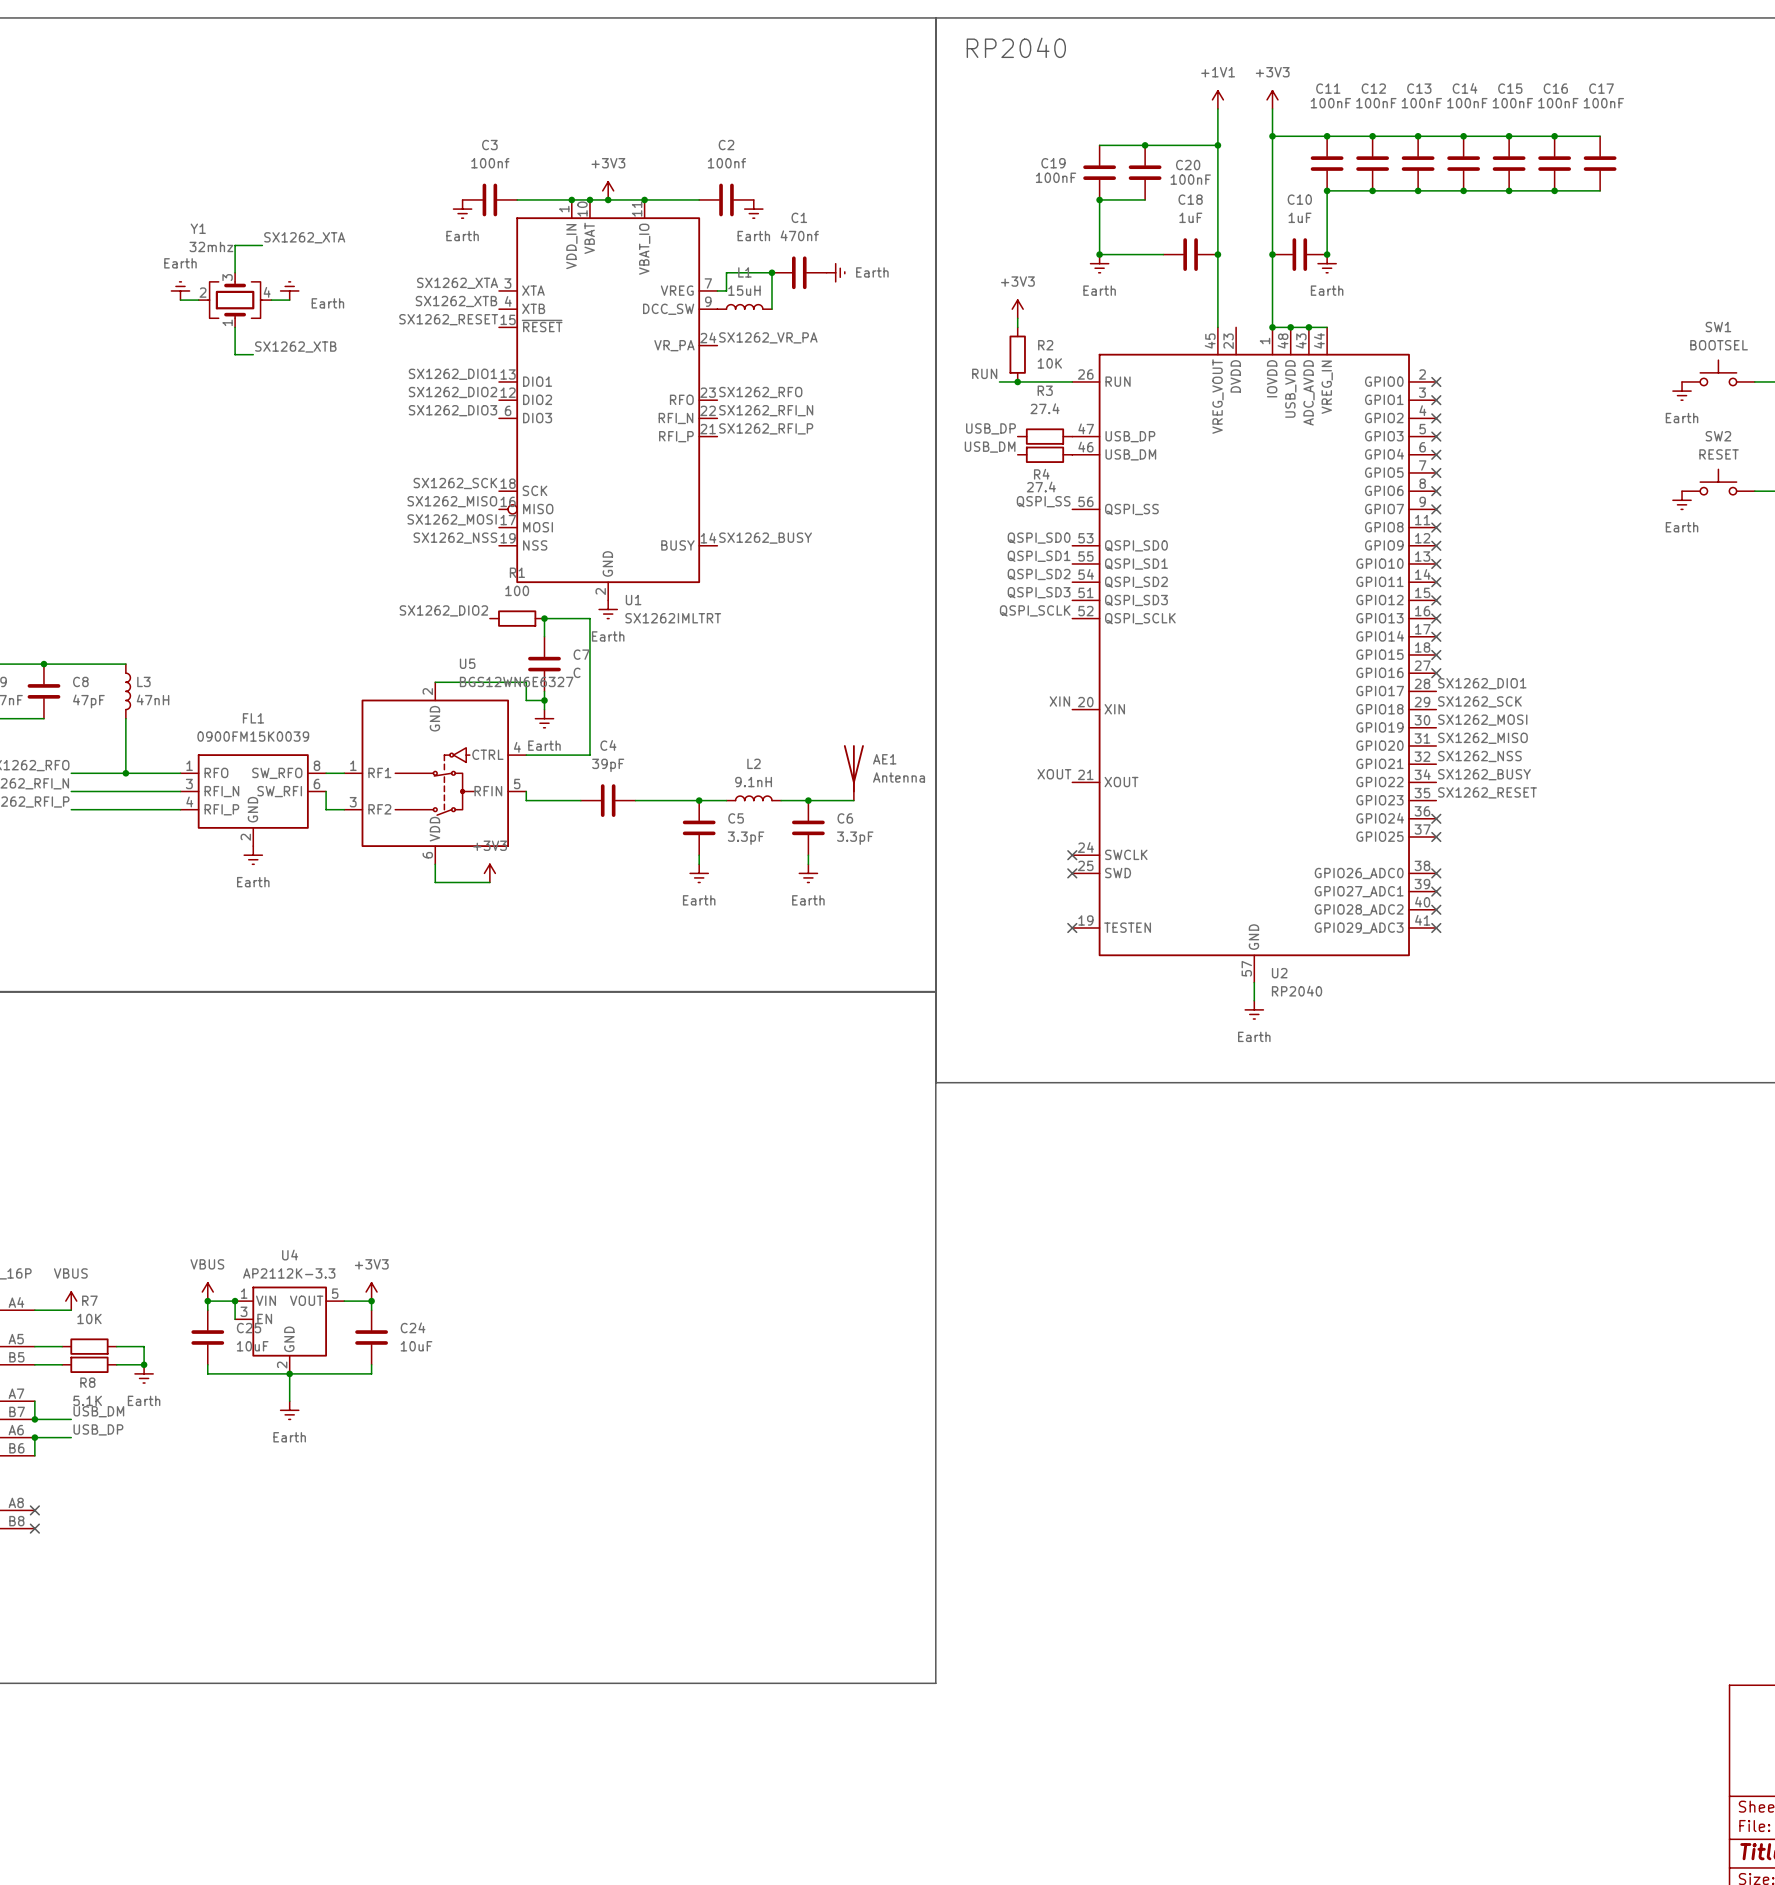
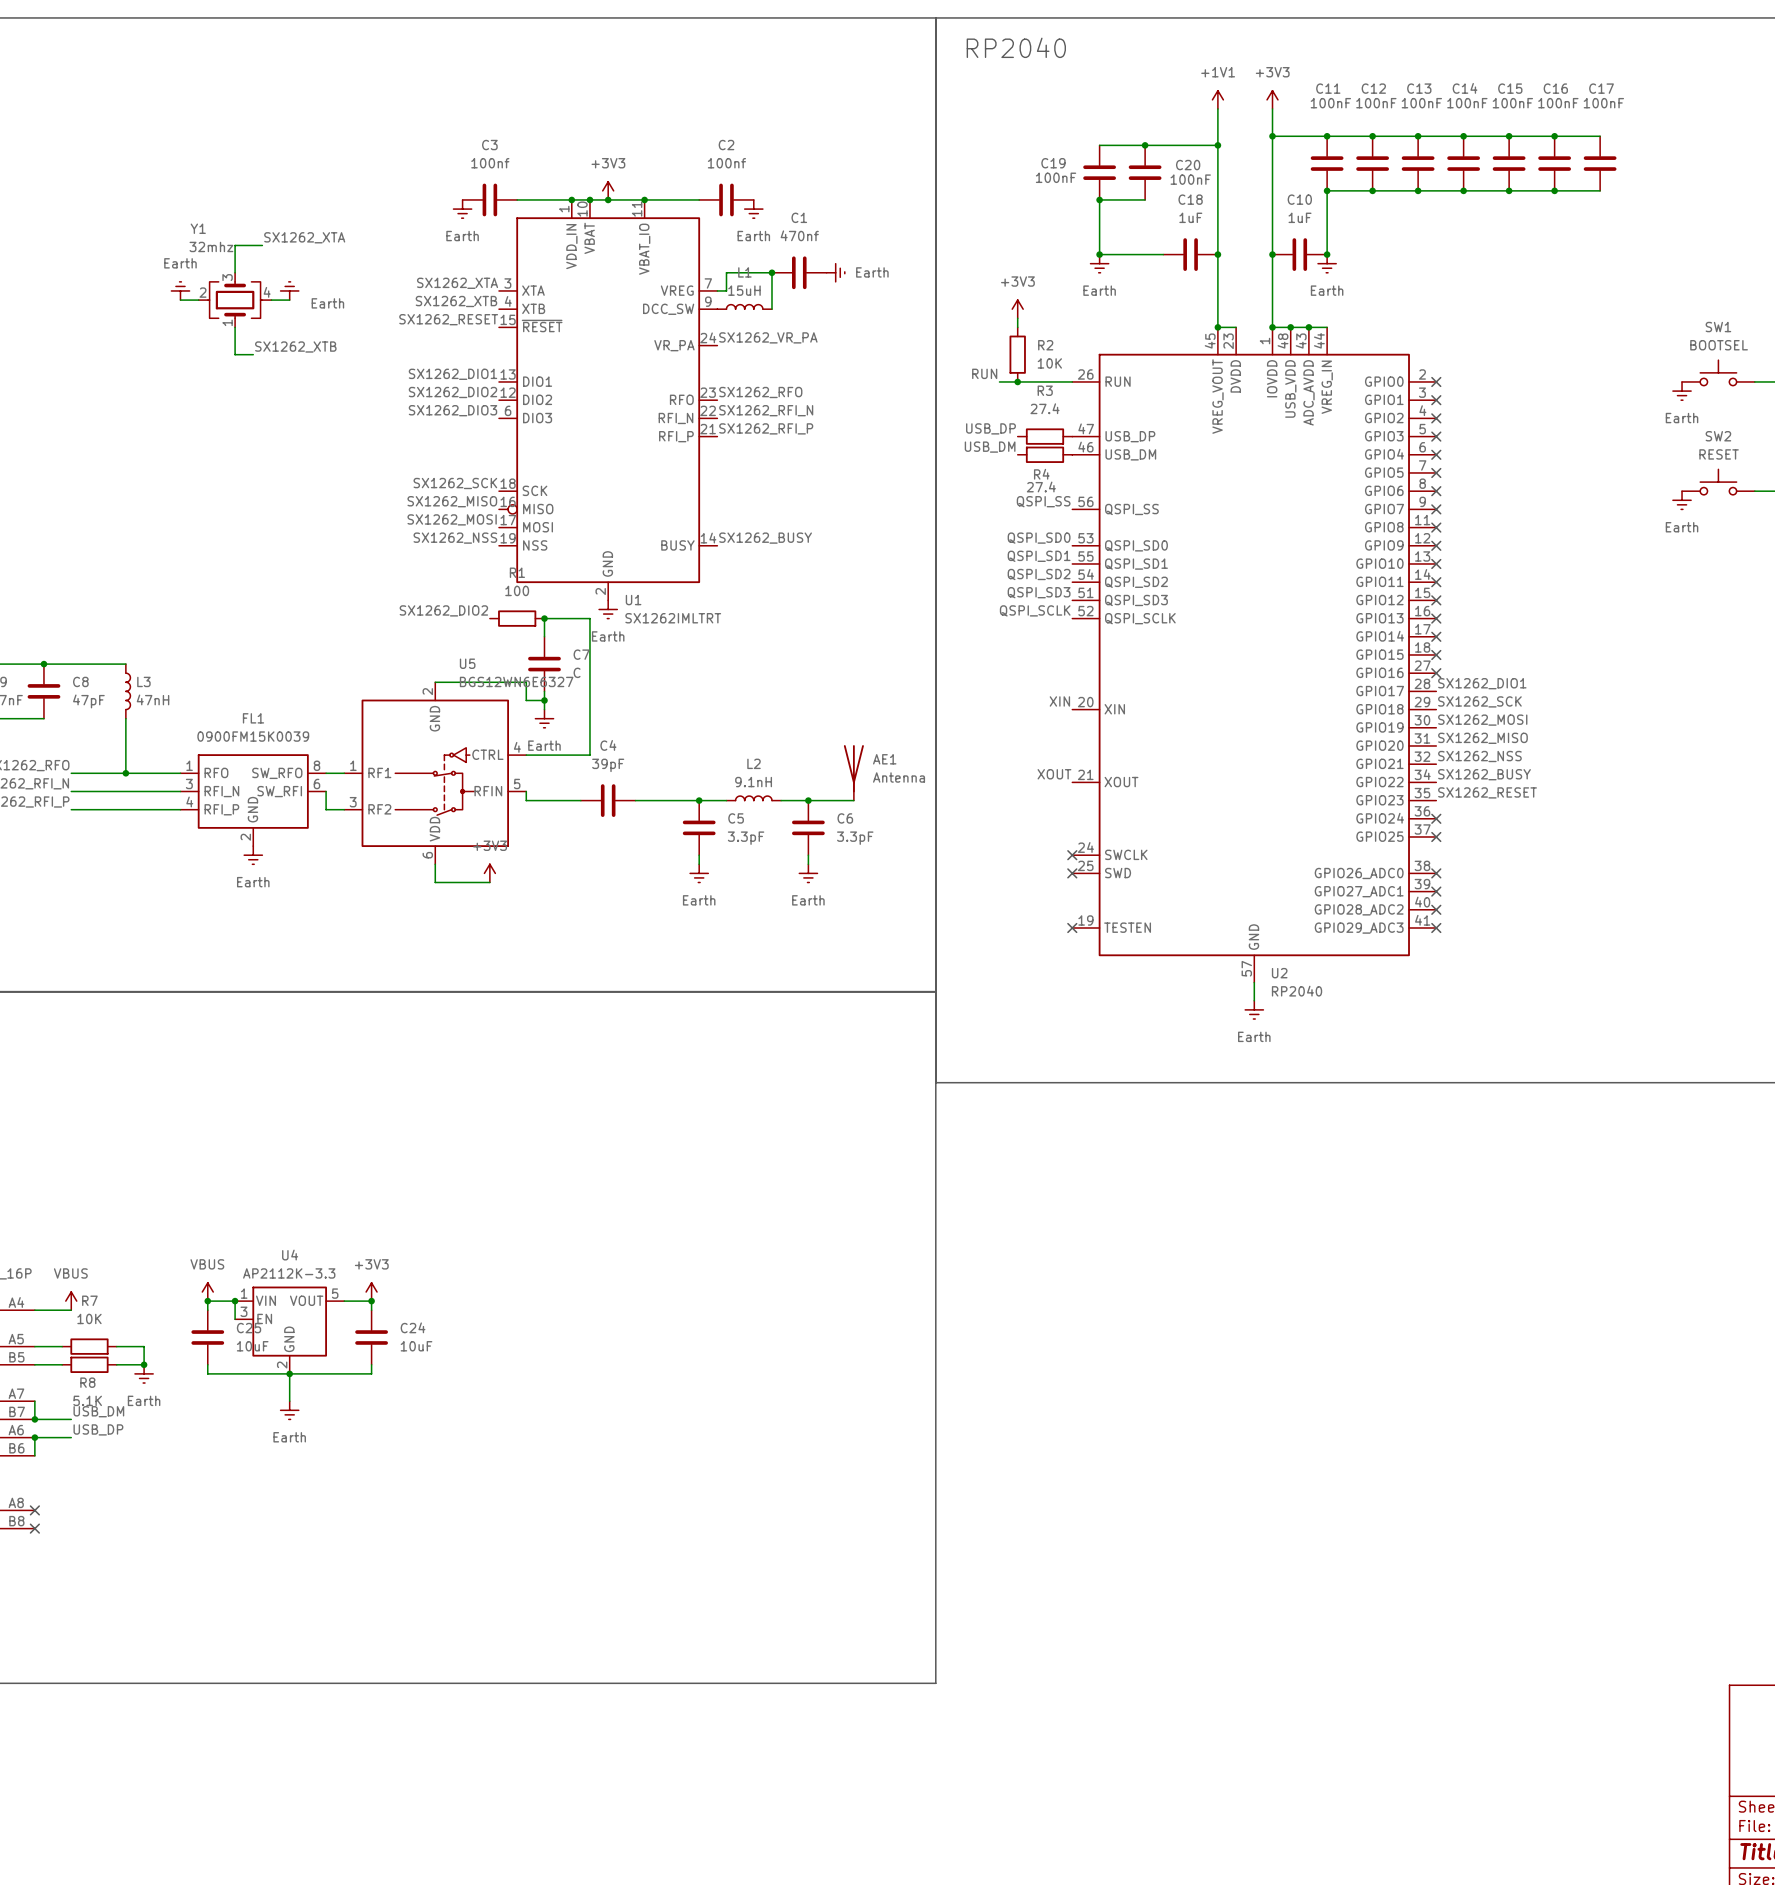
wire: none -> (1217, 327) (1236, 327)
junction: none -> (1217, 327)

